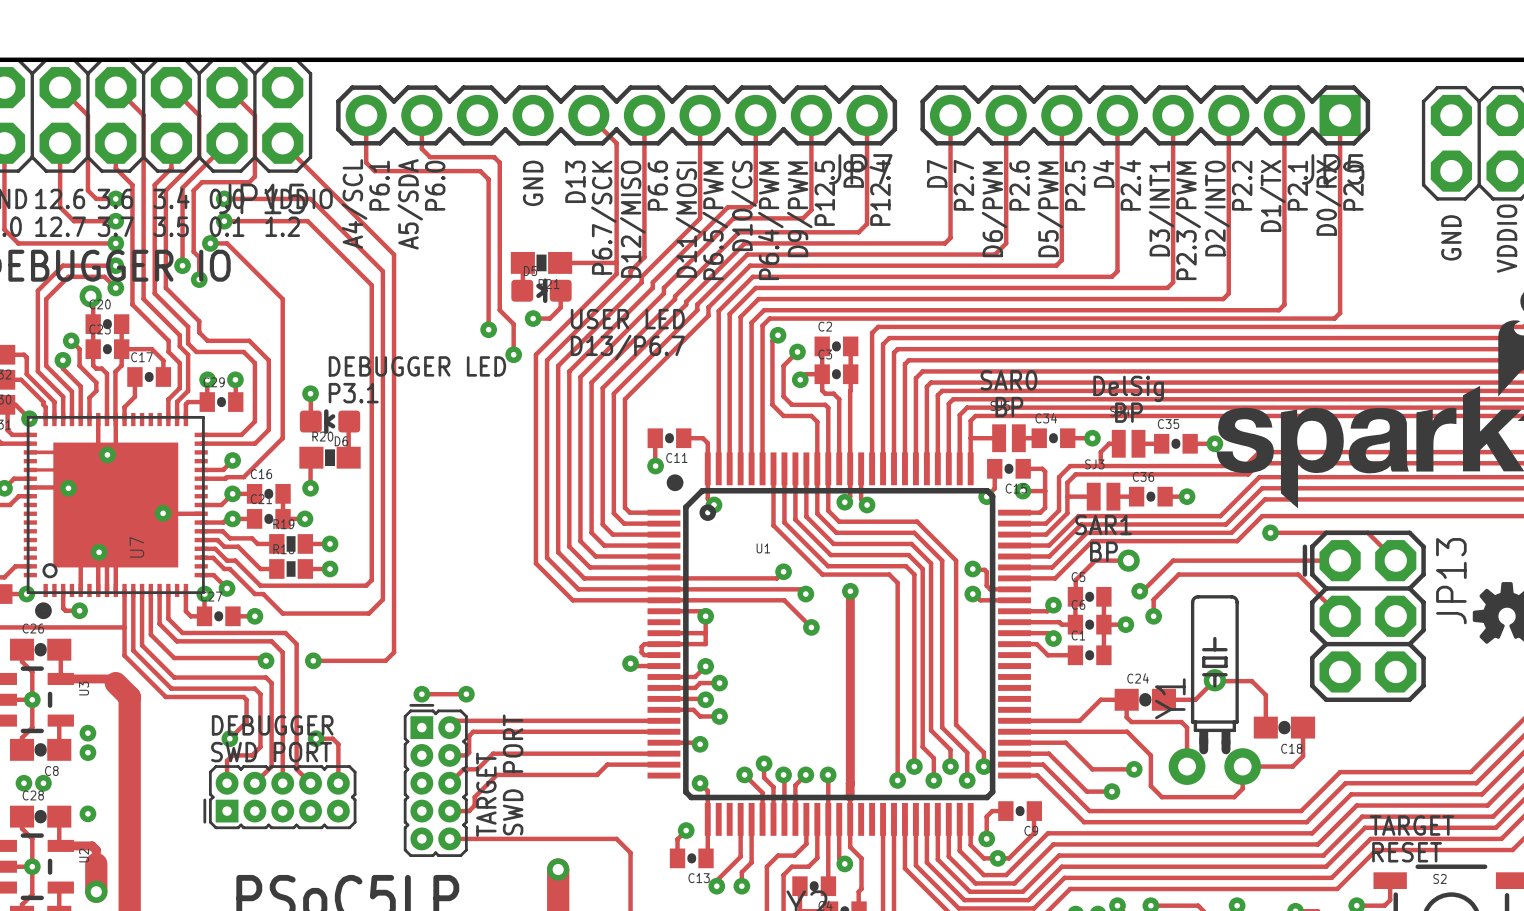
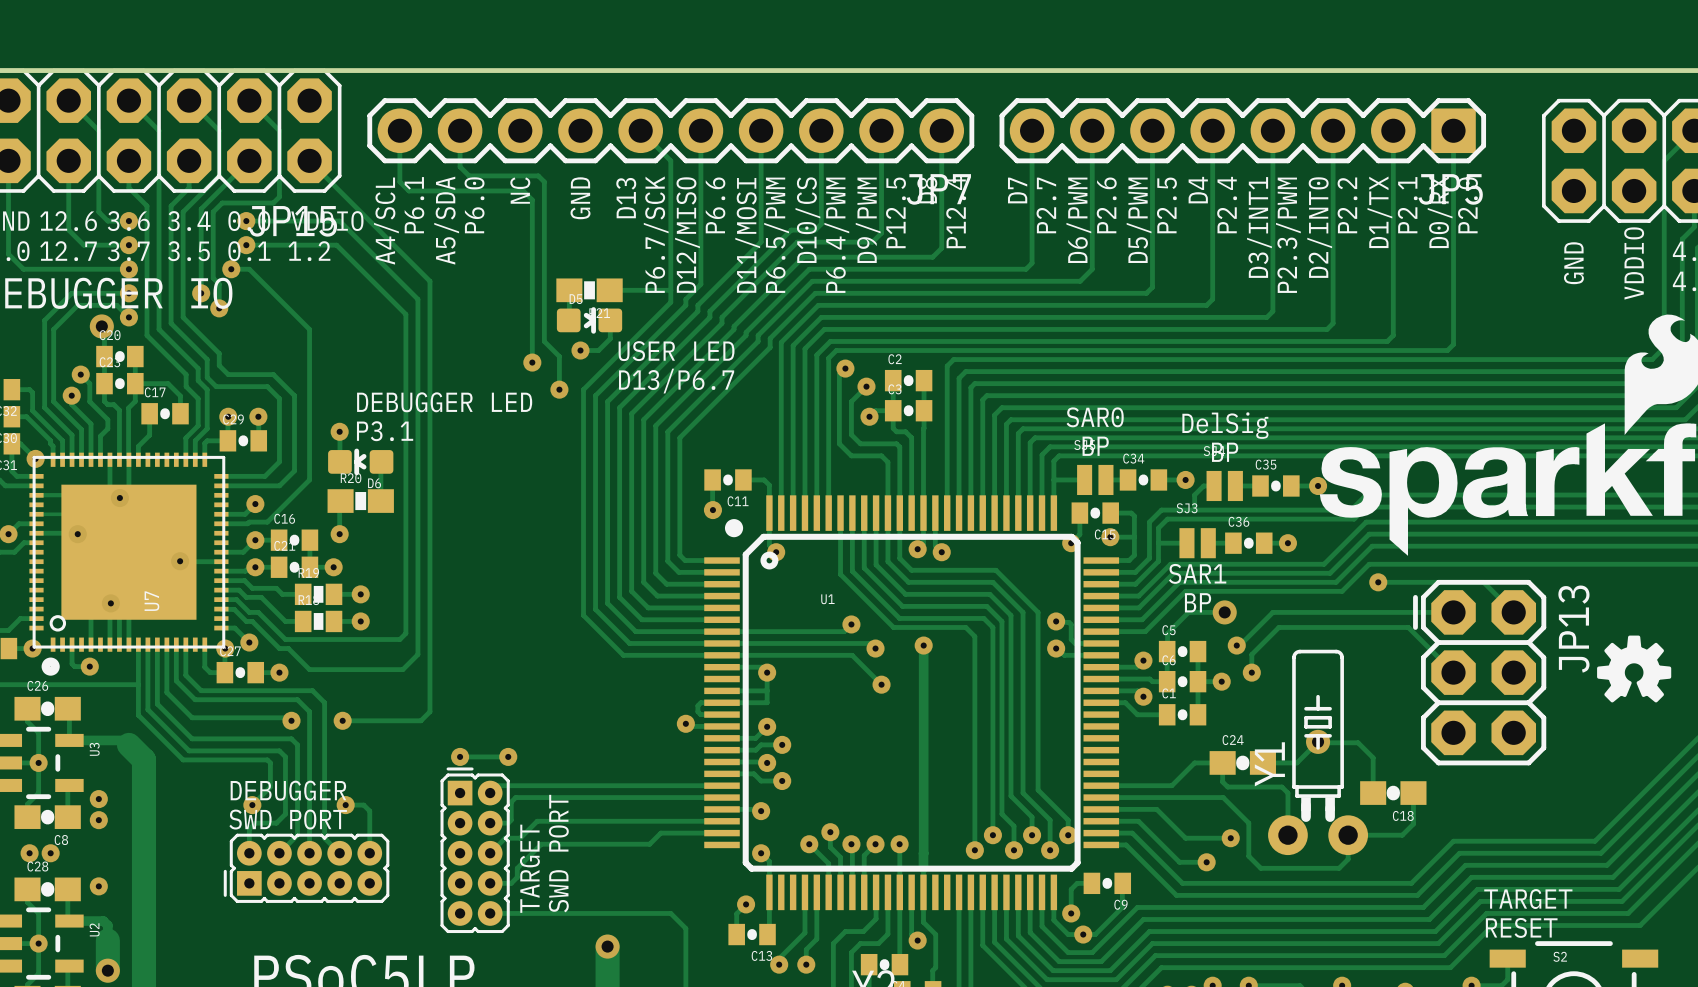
text: none -> NC (520, 190)

